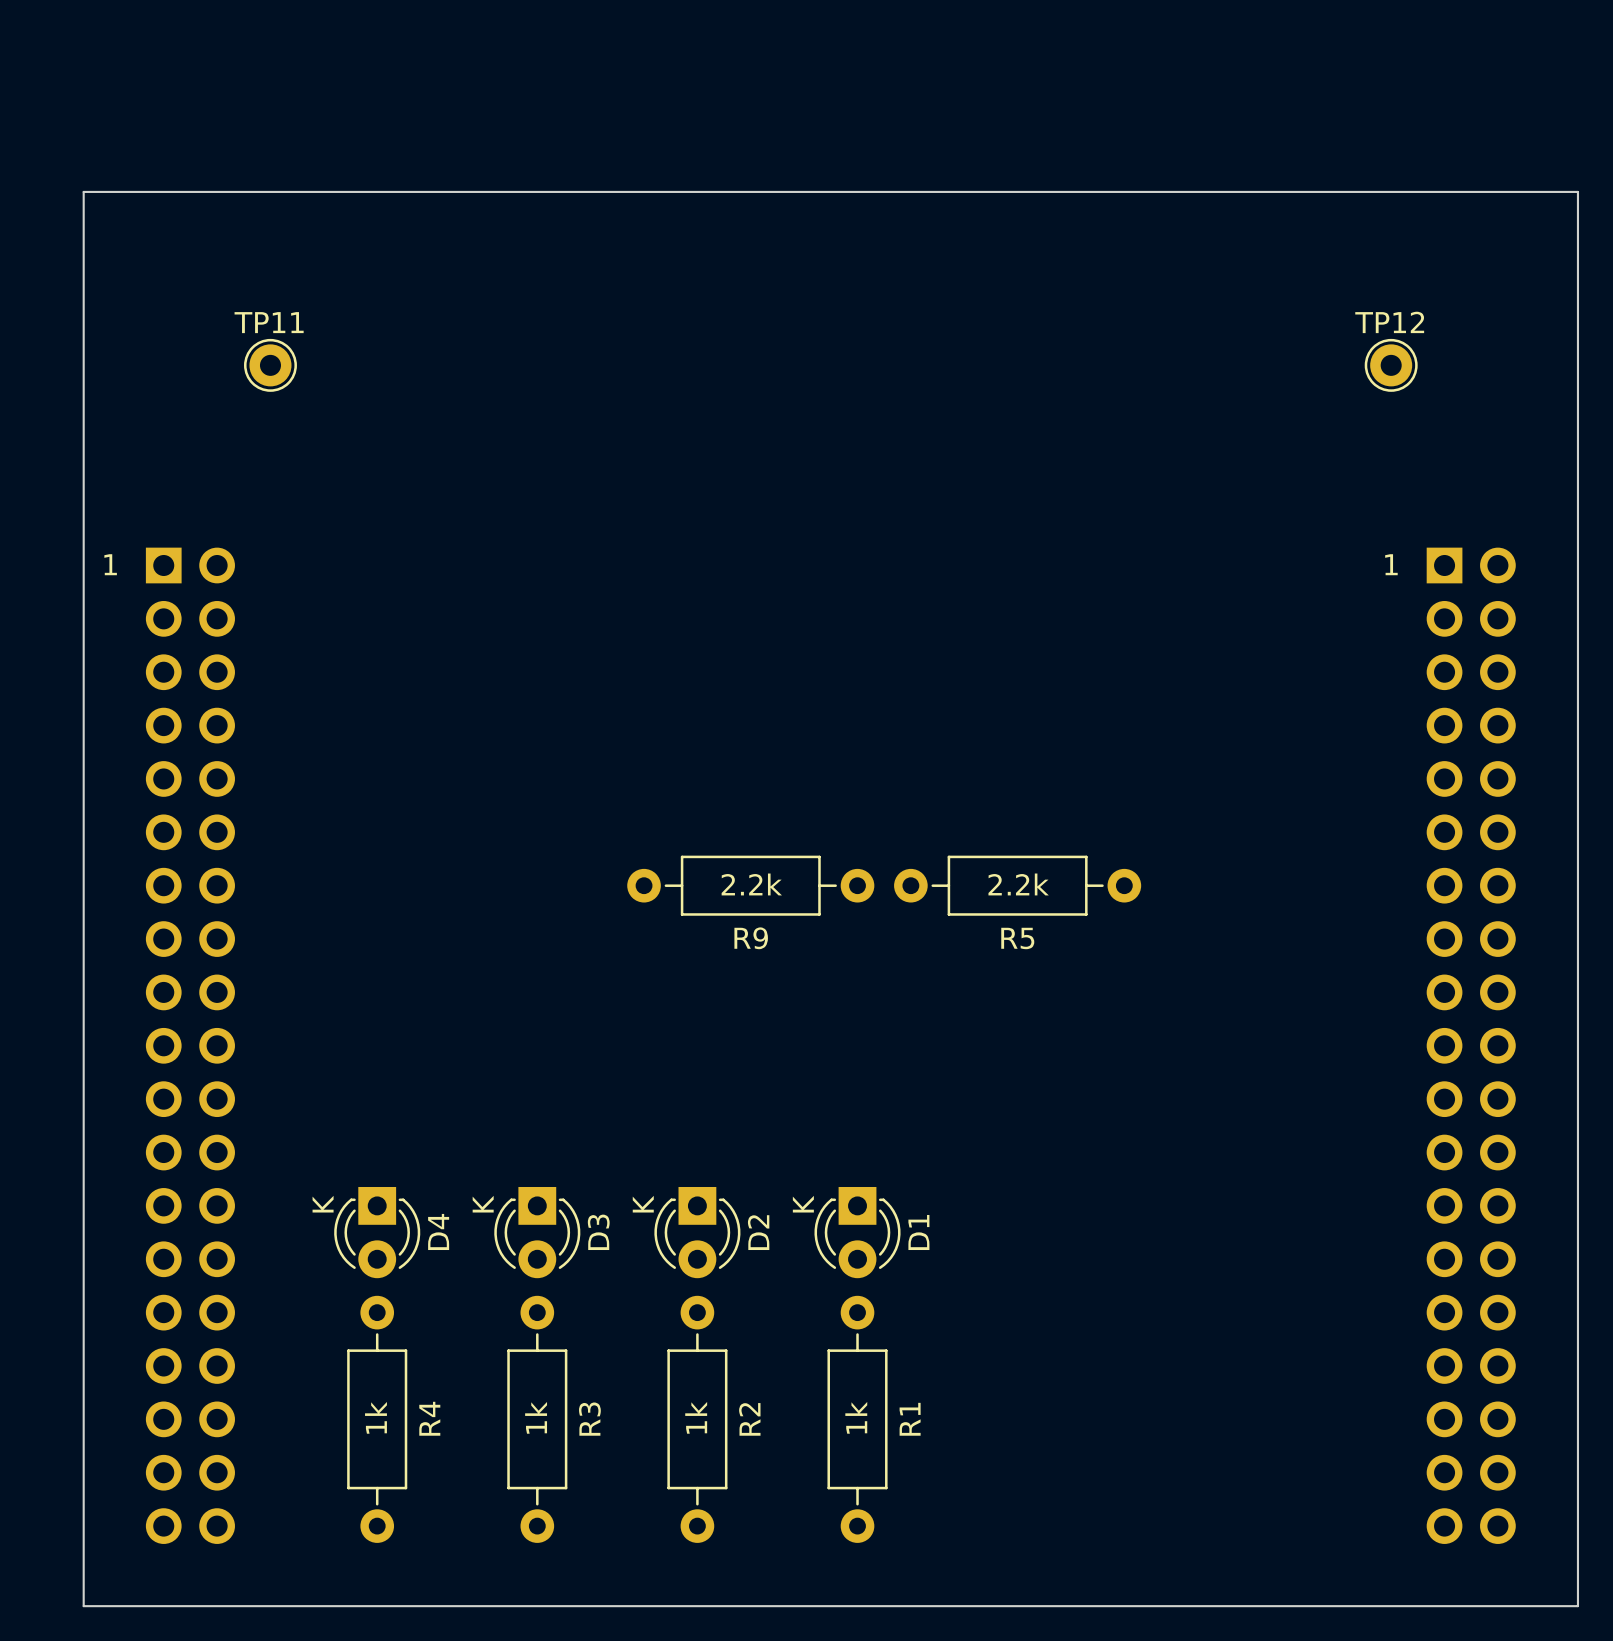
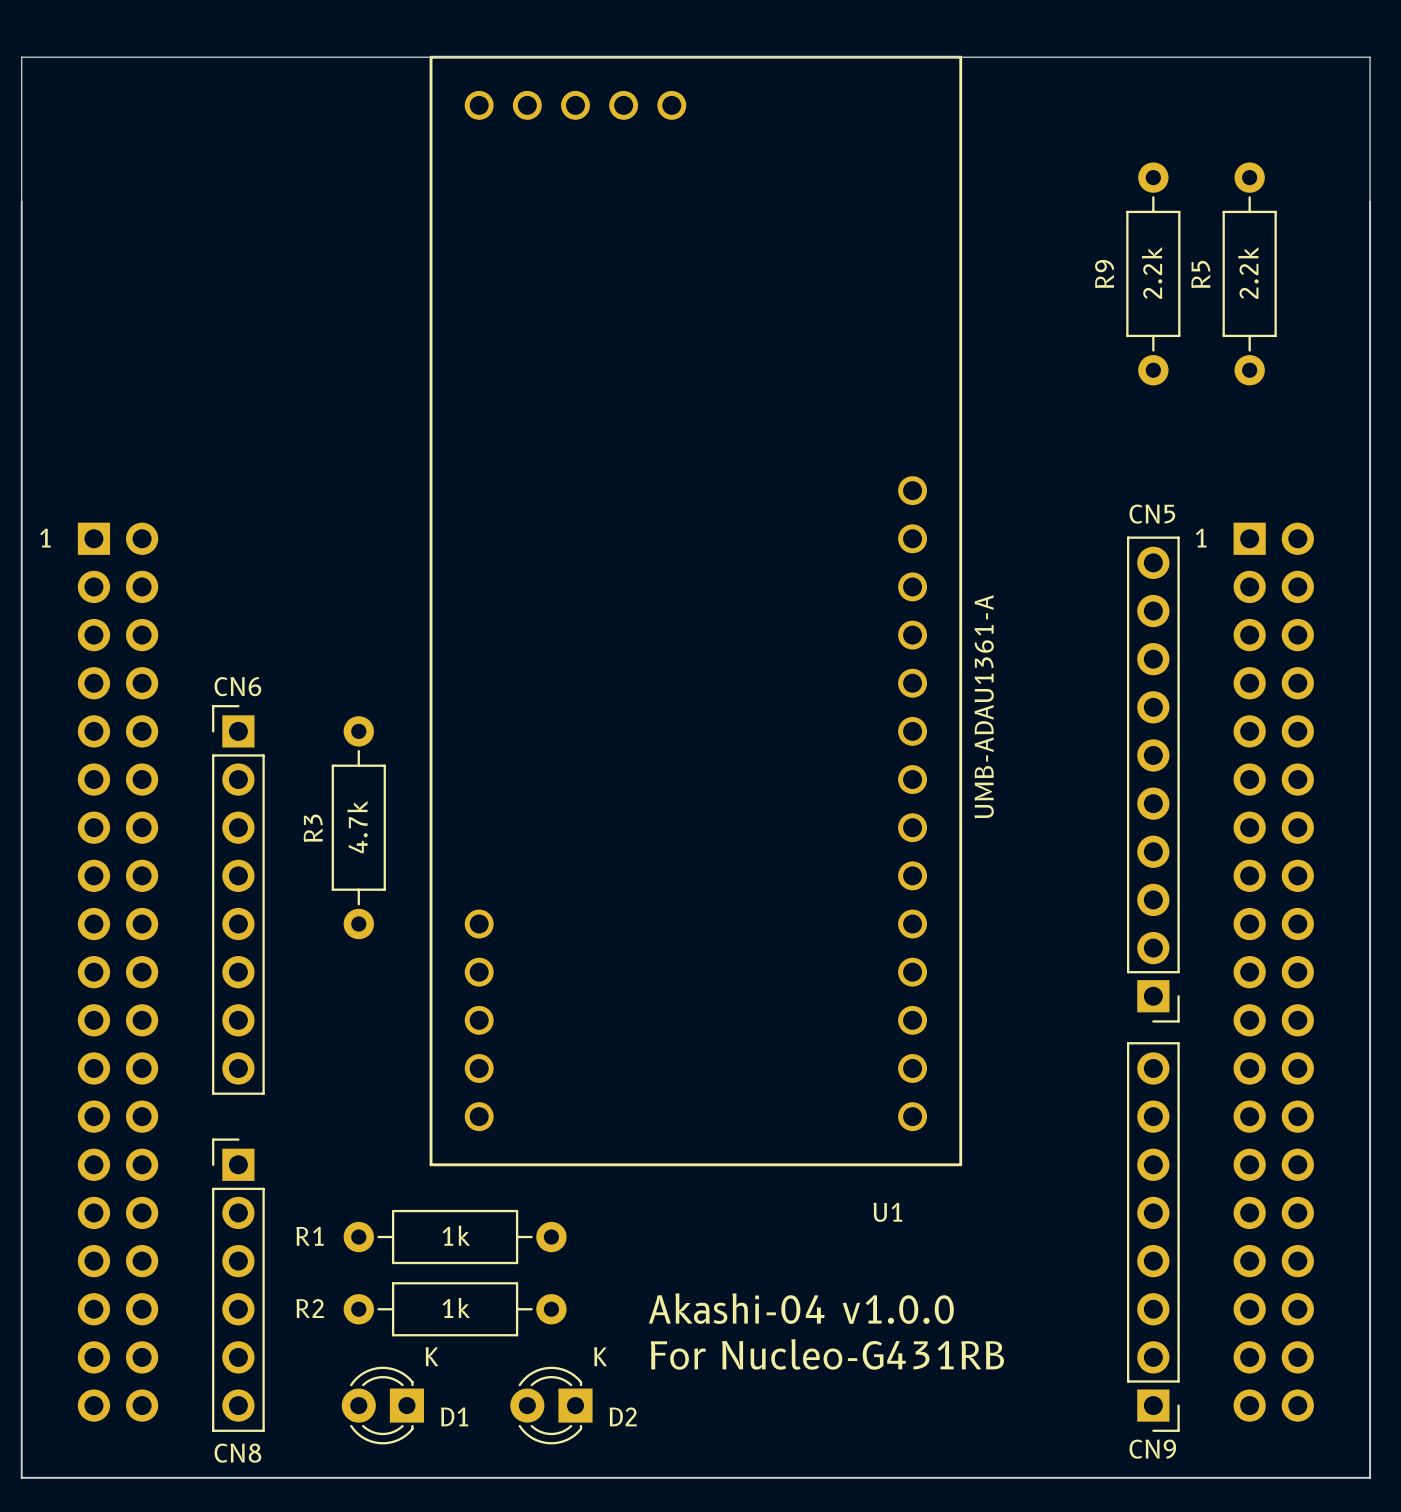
board edge: (83, 191) (1577, 191) -> (21, 201) (21, 57) (1370, 57) (1370, 201)
TP11: (270, 365) -> none
TP12: (1391, 365) -> none
U1: none -> (695, 611)
text: none -> UMB-ADAU1361-A (984, 706)
CN5: none -> (1153, 779)
R9 rotation: 0° (750, 885) -> 90° clockwise (1153, 273)
R9 position: (750, 885) -> (1153, 273)
R5 rotation: 0° (1017, 885) -> 90° clockwise (1249, 273)
R5 position: (1017, 885) -> (1249, 273)
CN6: none -> (238, 899)
text: K (323, 1204) -> none
text: K (483, 1204) -> none
text: K (643, 1204) -> none
text: K (803, 1204) -> none
D4: (377, 1232) -> none
D3: (537, 1232) -> none
D2 rotation: 0° (697, 1232) -> 90° clockwise (551, 1405)
D2 position: (697, 1232) -> (551, 1405)
D1 rotation: 0° (857, 1232) -> 90° clockwise (382, 1405)
D1 position: (857, 1232) -> (382, 1405)
CN9: none -> (1153, 1237)
CN8: none -> (238, 1285)
R3 value: 1k (536, 1417) -> 4.7k (357, 827)
R4: 1k (377, 1419) -> none
R3 position: (537, 1419) -> (358, 827)
R3 name position: R3 (589, 1419) -> R3 (313, 828)
R2 rotation: 0° (697, 1419) -> 90° clockwise (455, 1309)
R2 name position: R2 (749, 1419) -> R2 (310, 1308)
R1 rotation: 0° (857, 1419) -> 90° clockwise (455, 1237)
R1 position: (857, 1419) -> (455, 1237)
R1 name position: R1 (910, 1419) -> R1 (310, 1236)
text: none -> Akashi-04 v1.0.0 (801, 1308)
text: none -> For Nucleo-G431RB (827, 1354)
text: none -> K (431, 1356)
text: none -> K (600, 1356)

